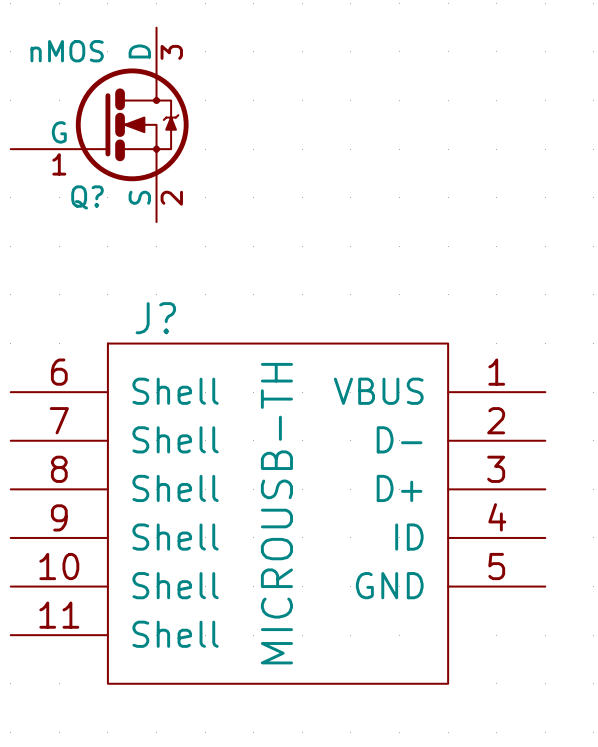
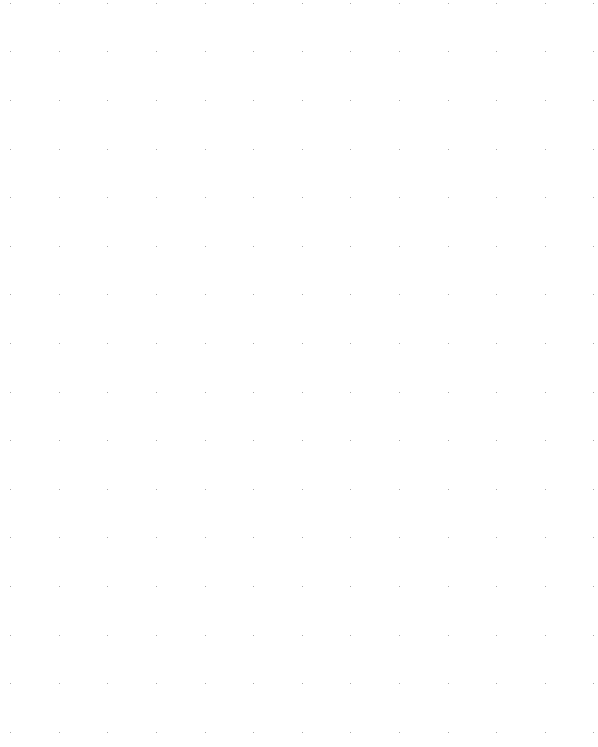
Q?: nMOS (99, 124) -> none
J?: MICROUSB-TH (278, 513) -> none

